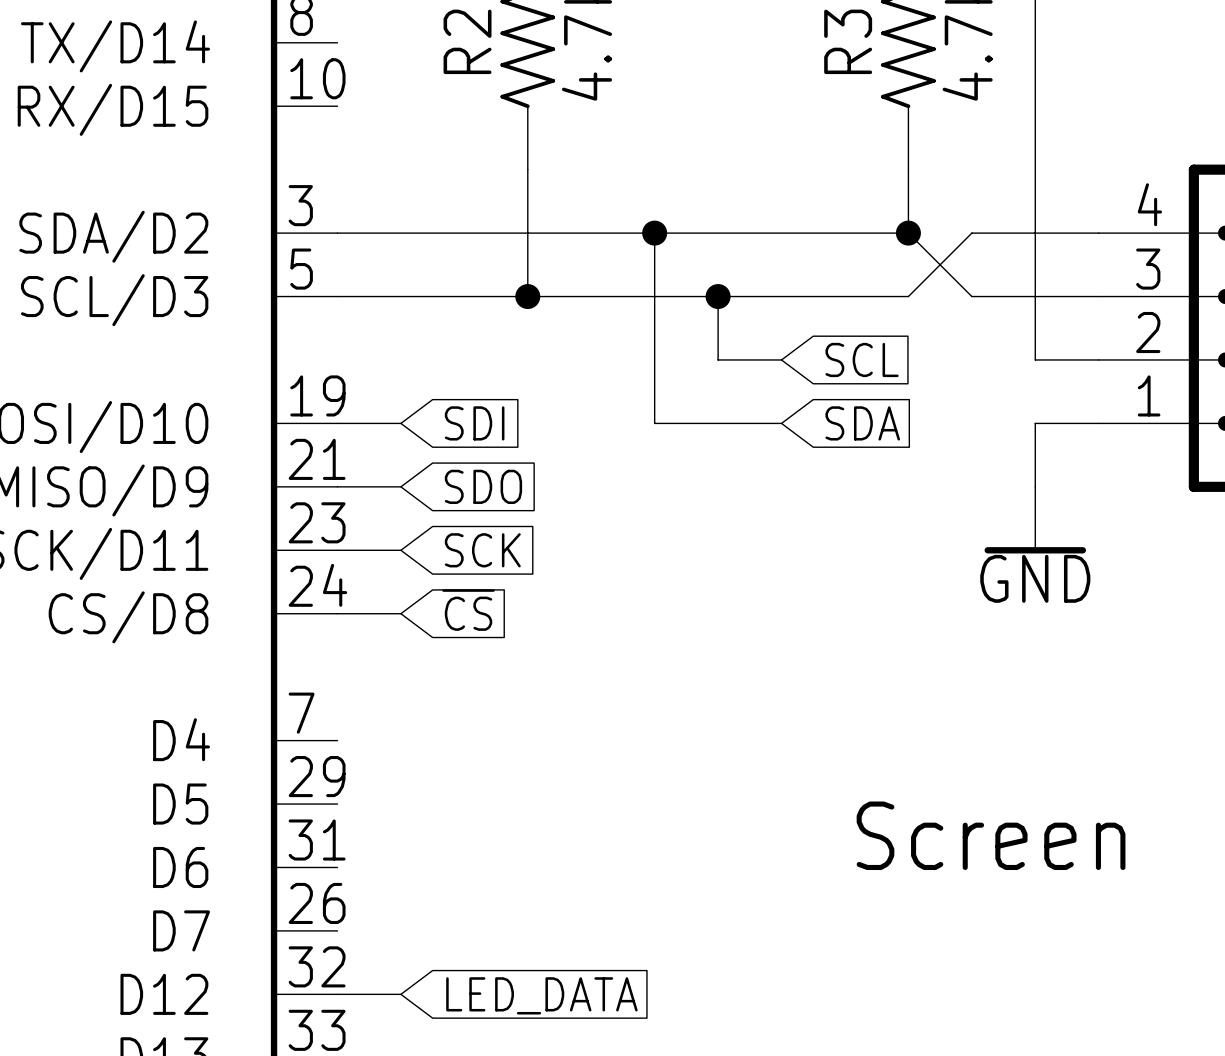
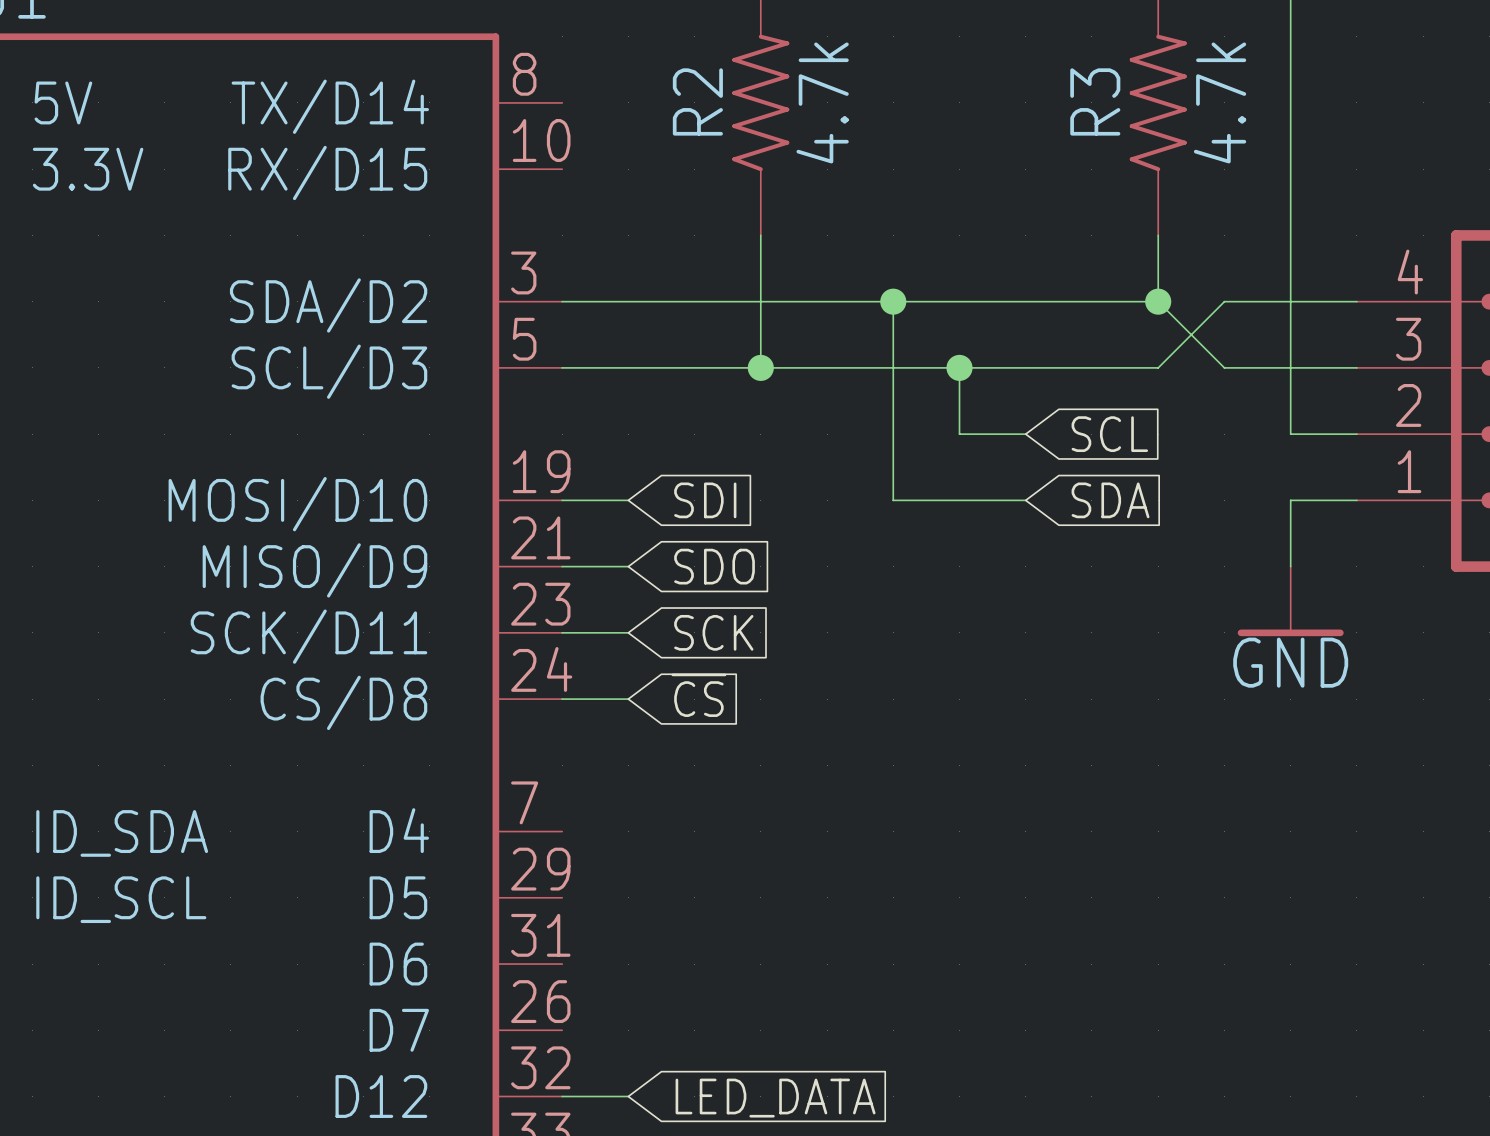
text: Screen (991, 835) -> none

